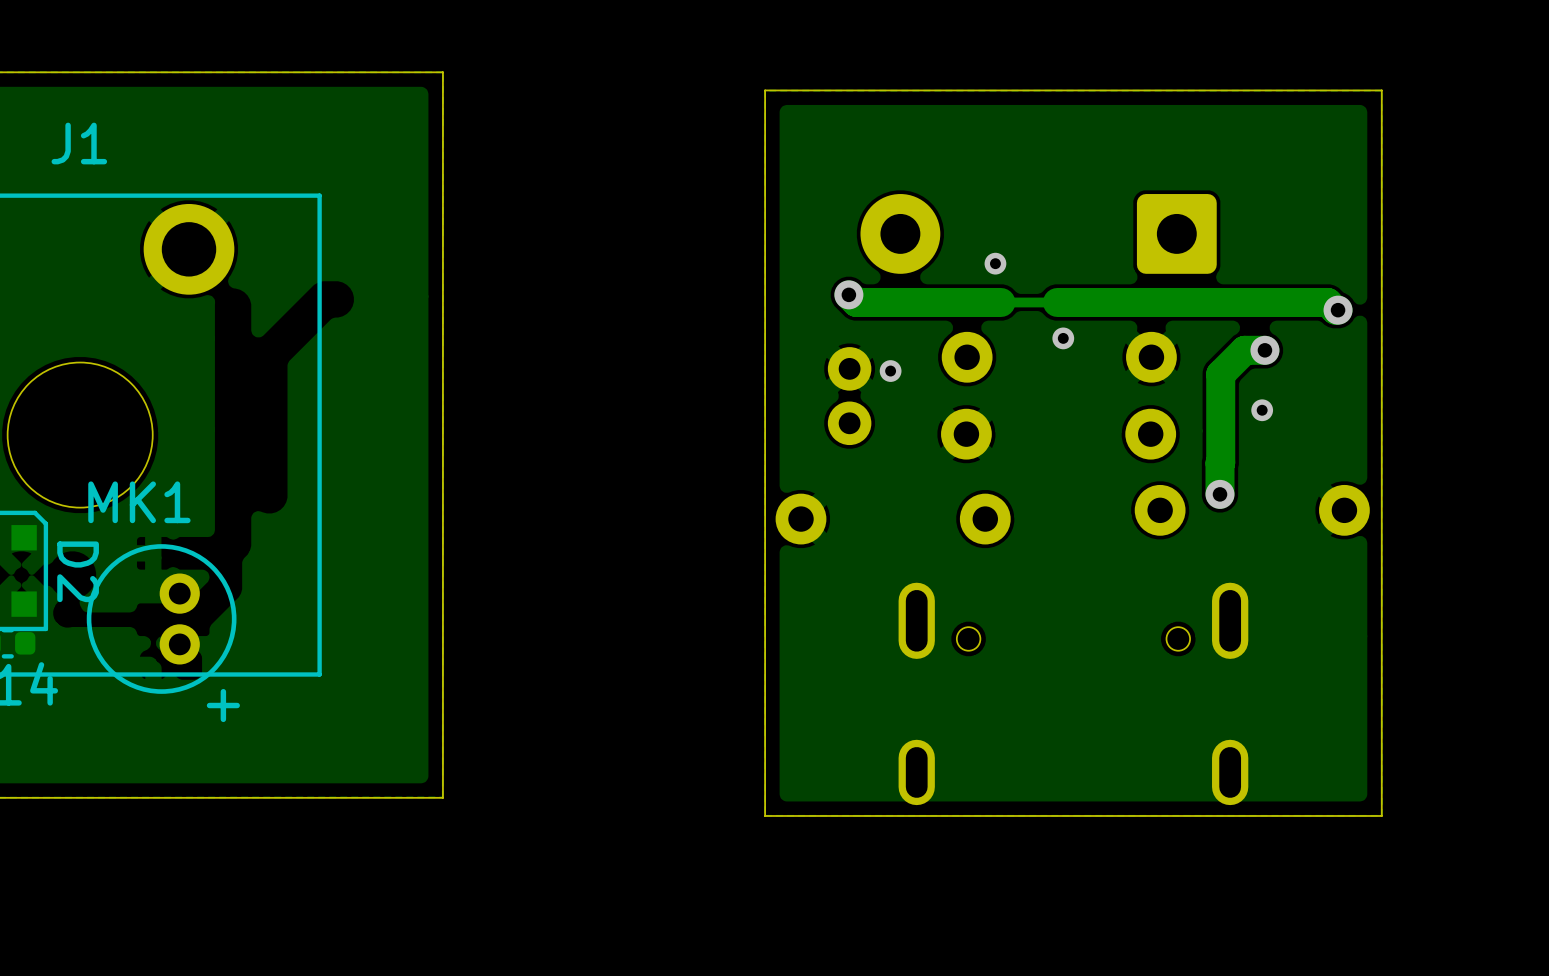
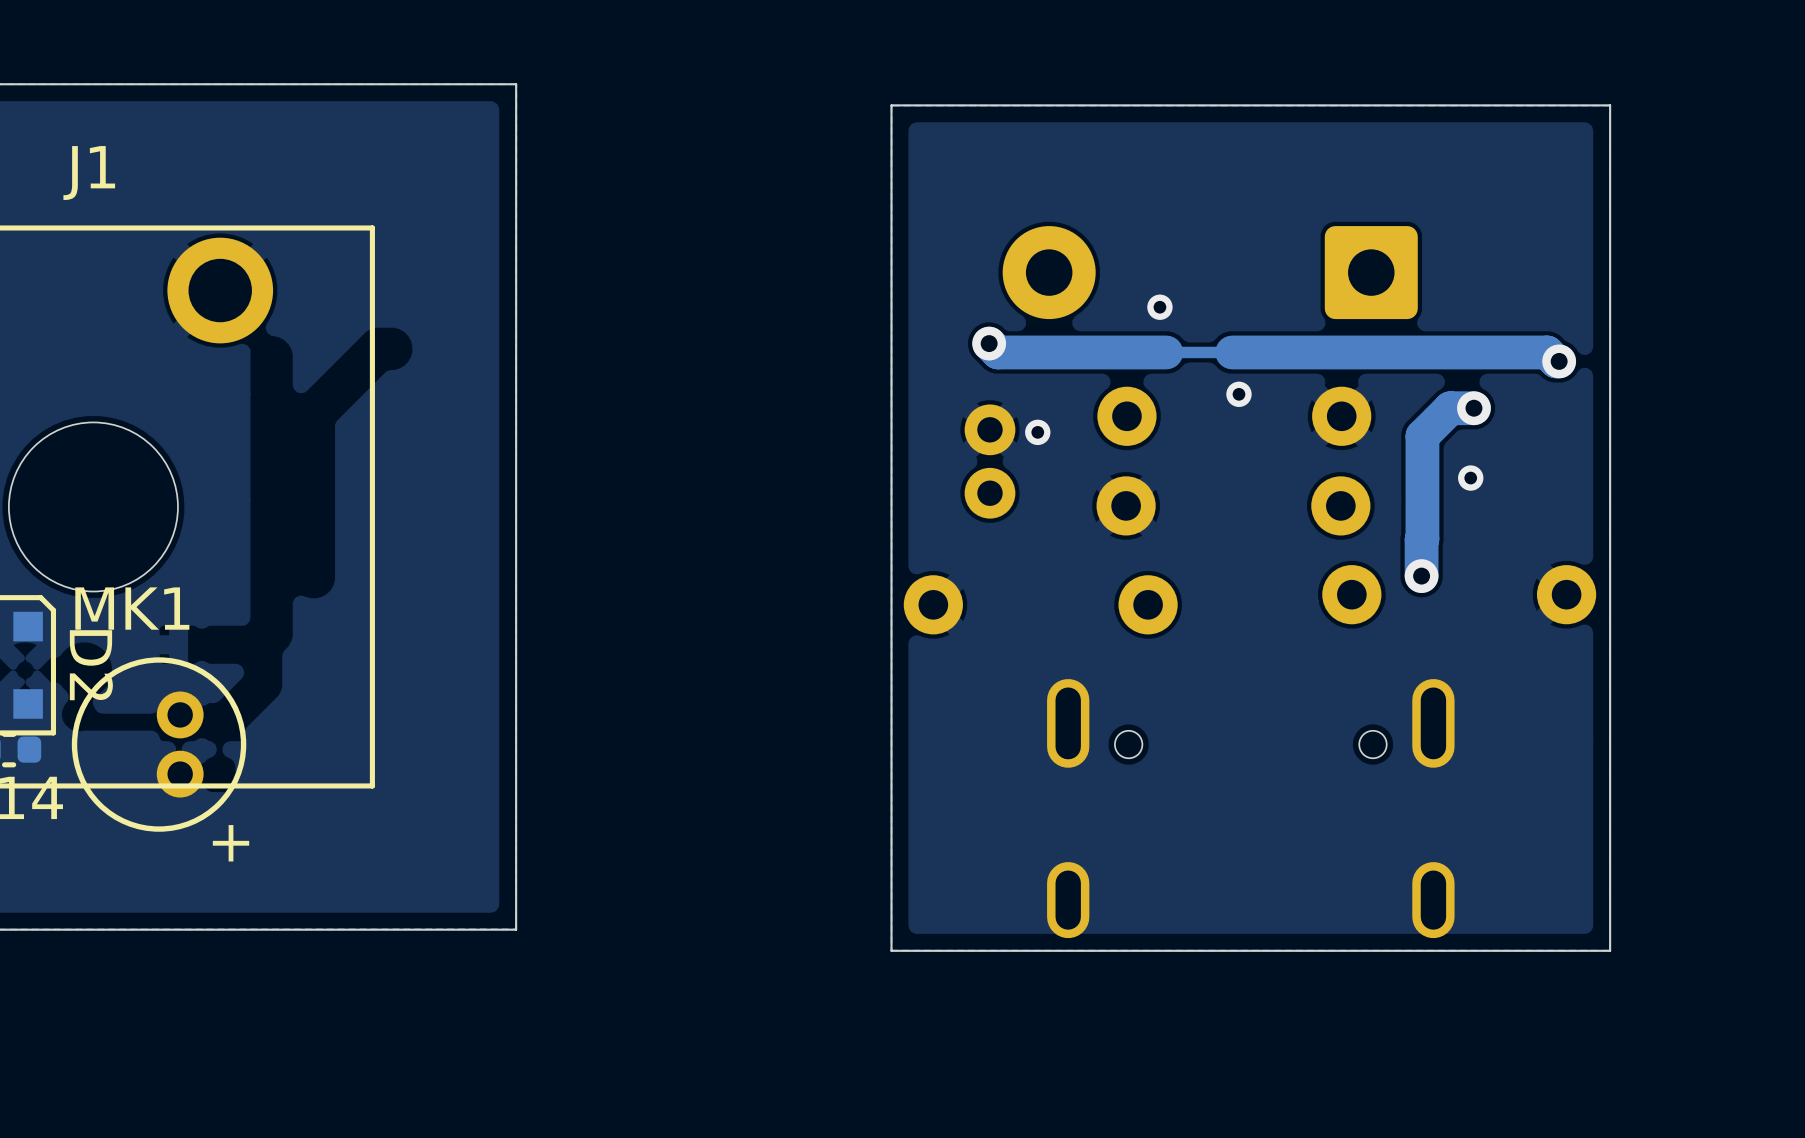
MK1 position: (161, 619) -> (159, 744)

